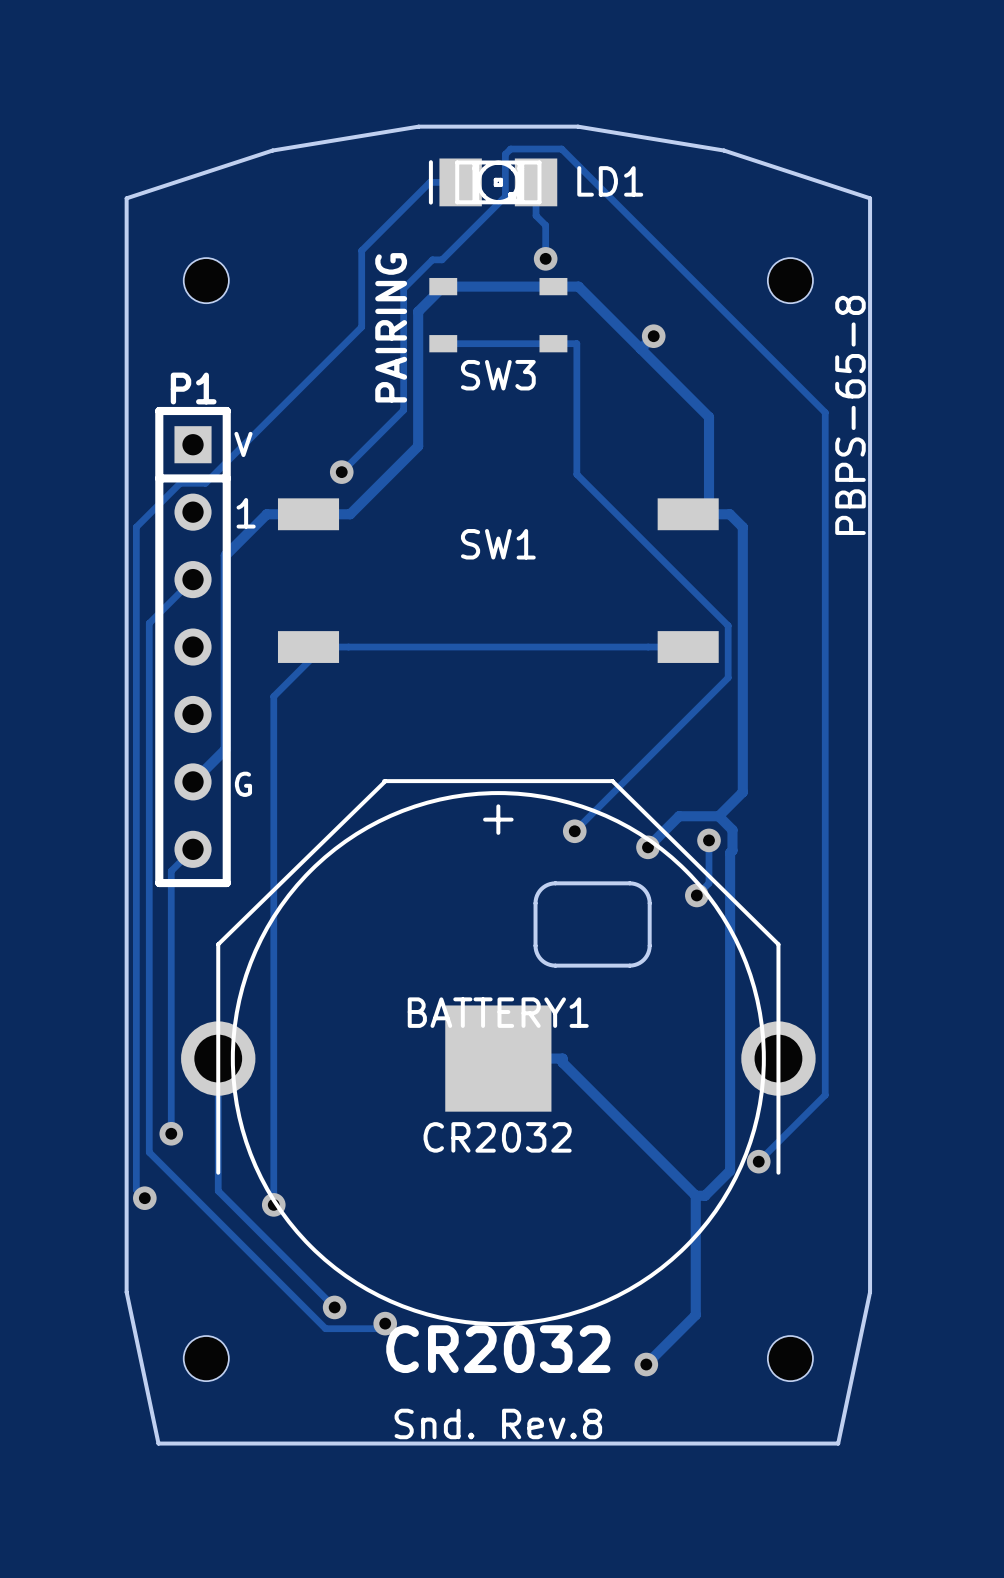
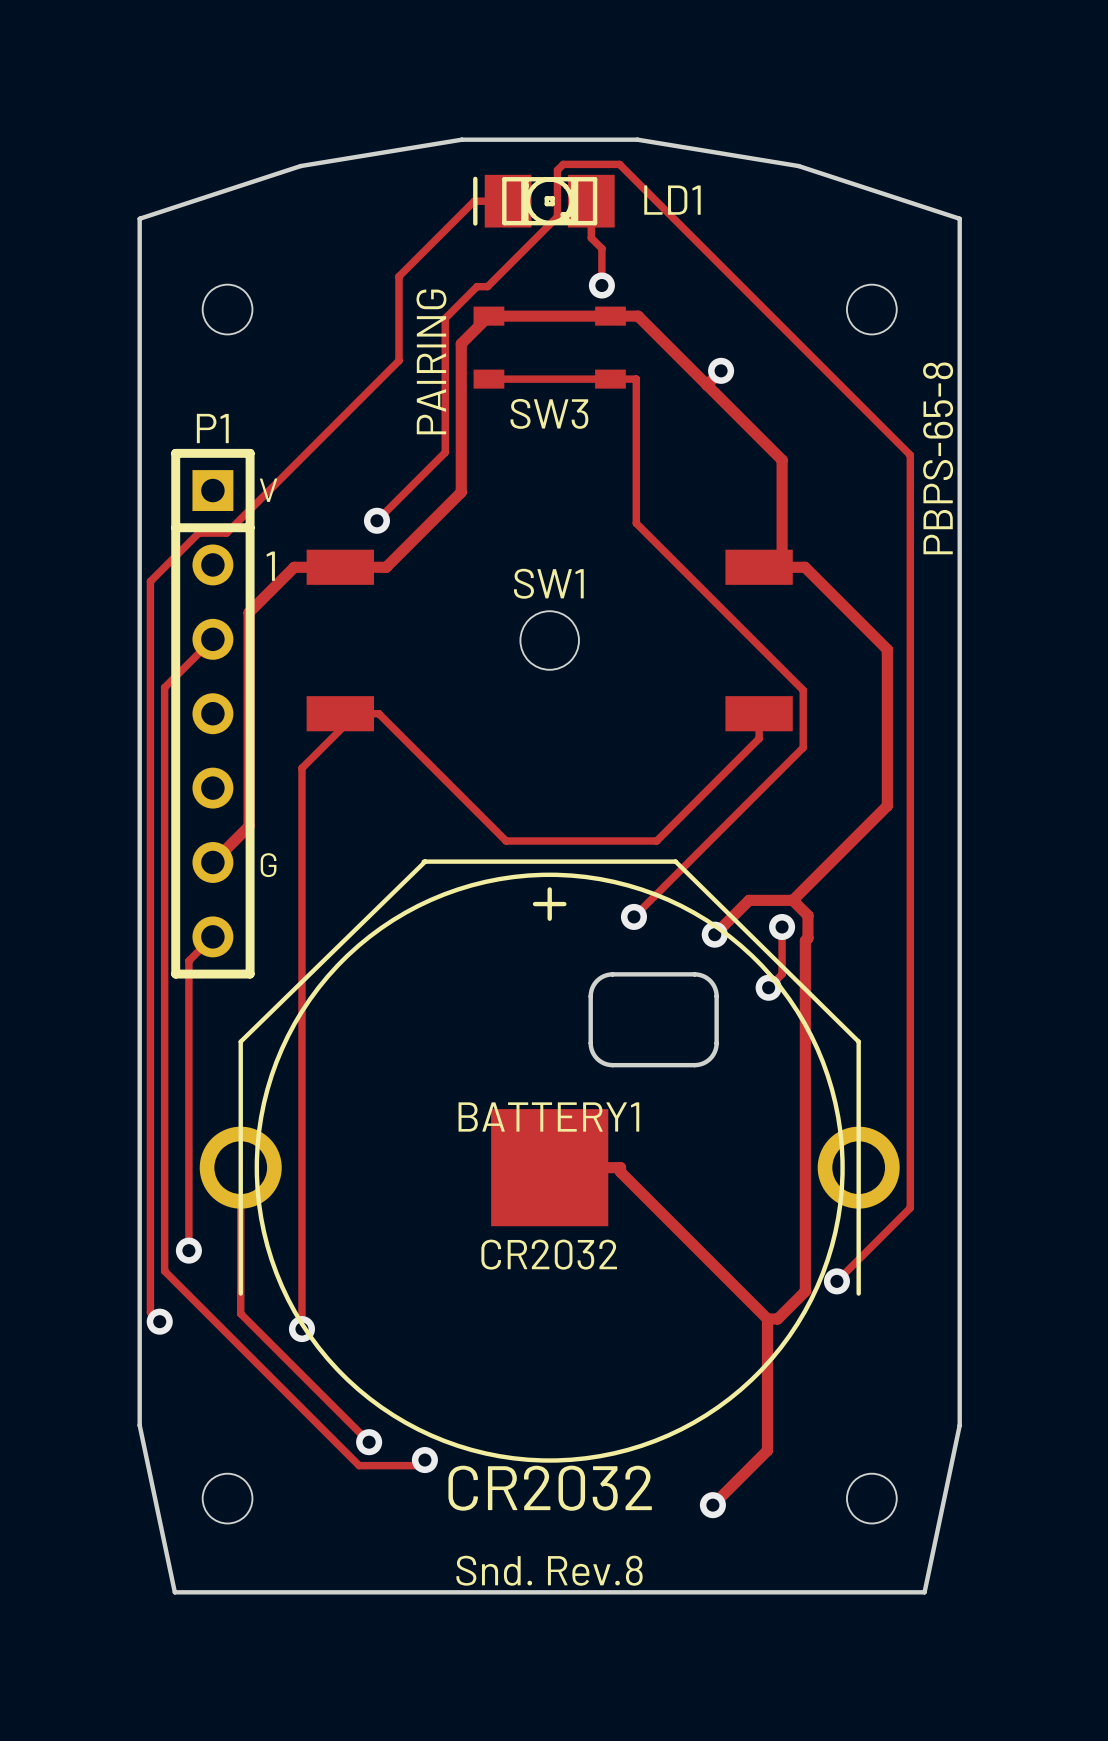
SW1 footprint: [277, 498, 719, 663] -> [306, 549, 793, 732]
track: (742, 527) (742, 792) -> (819, 581) (887, 649) (887, 805) (819, 873)
track: (343, 647) (688, 647) -> (378, 713) (506, 840) (656, 840) (759, 738) (759, 713)

